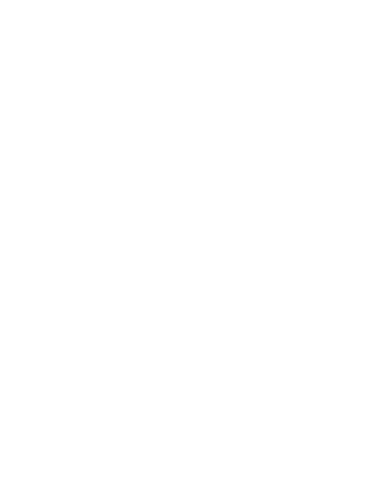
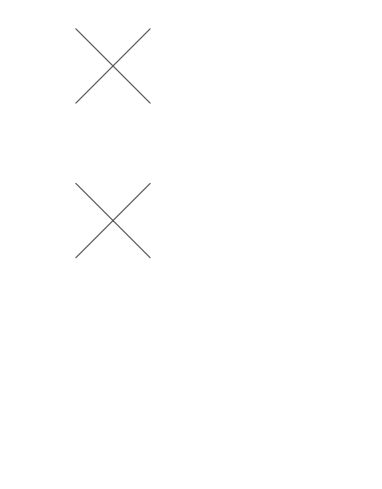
no-connect mark: none -> (112, 65)
no-connect mark: none -> (112, 220)

